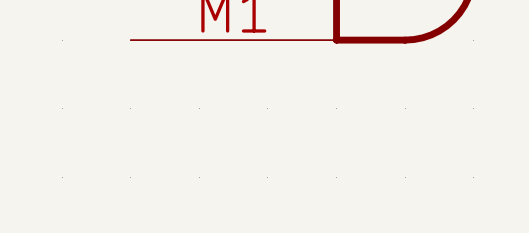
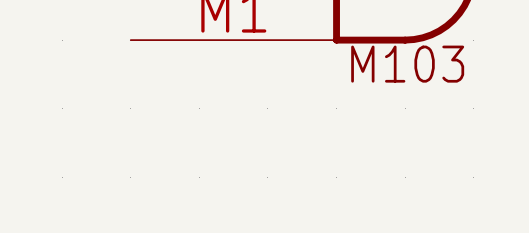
part value: none -> M103 (407, 64)

